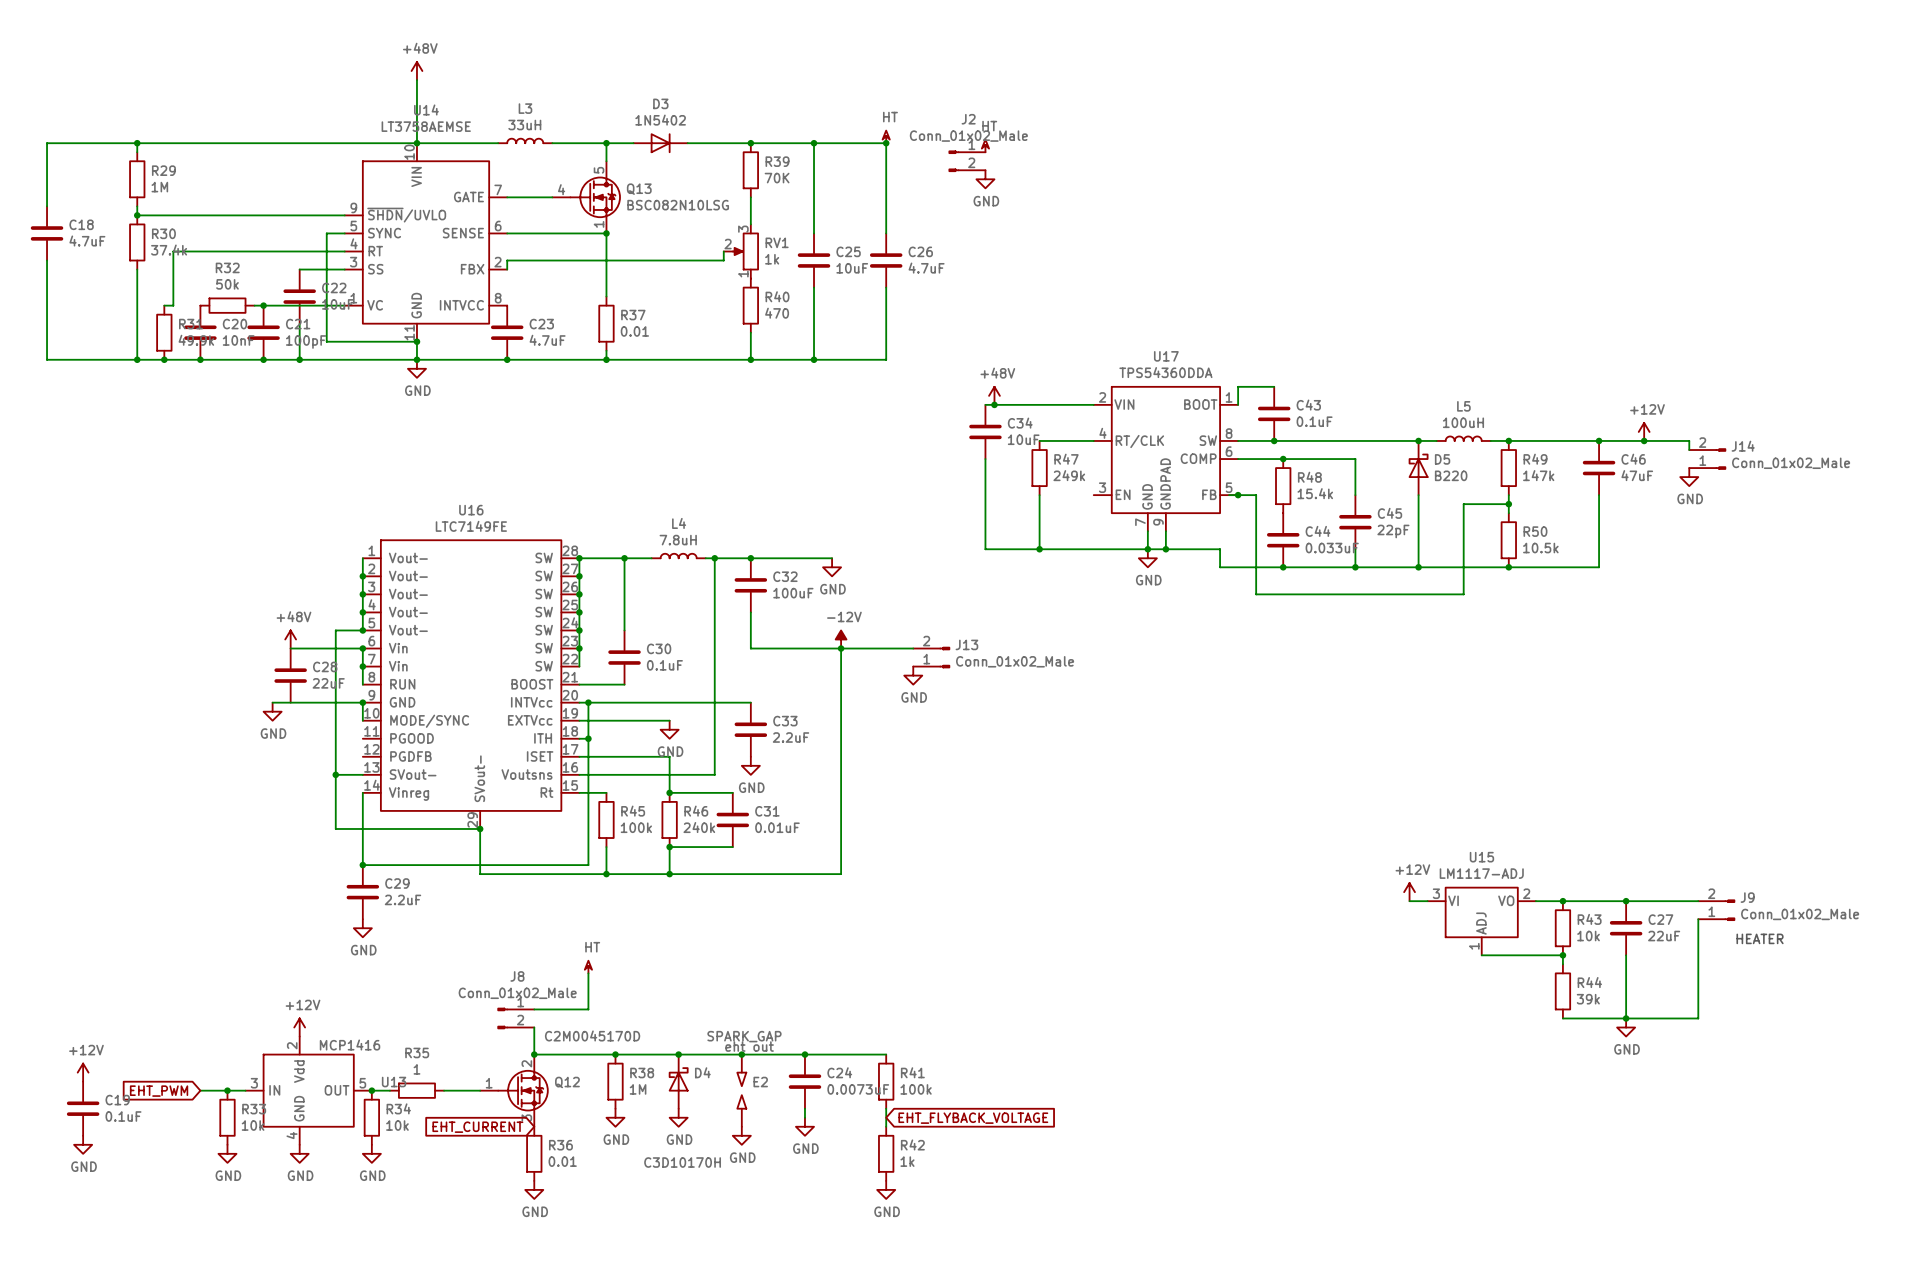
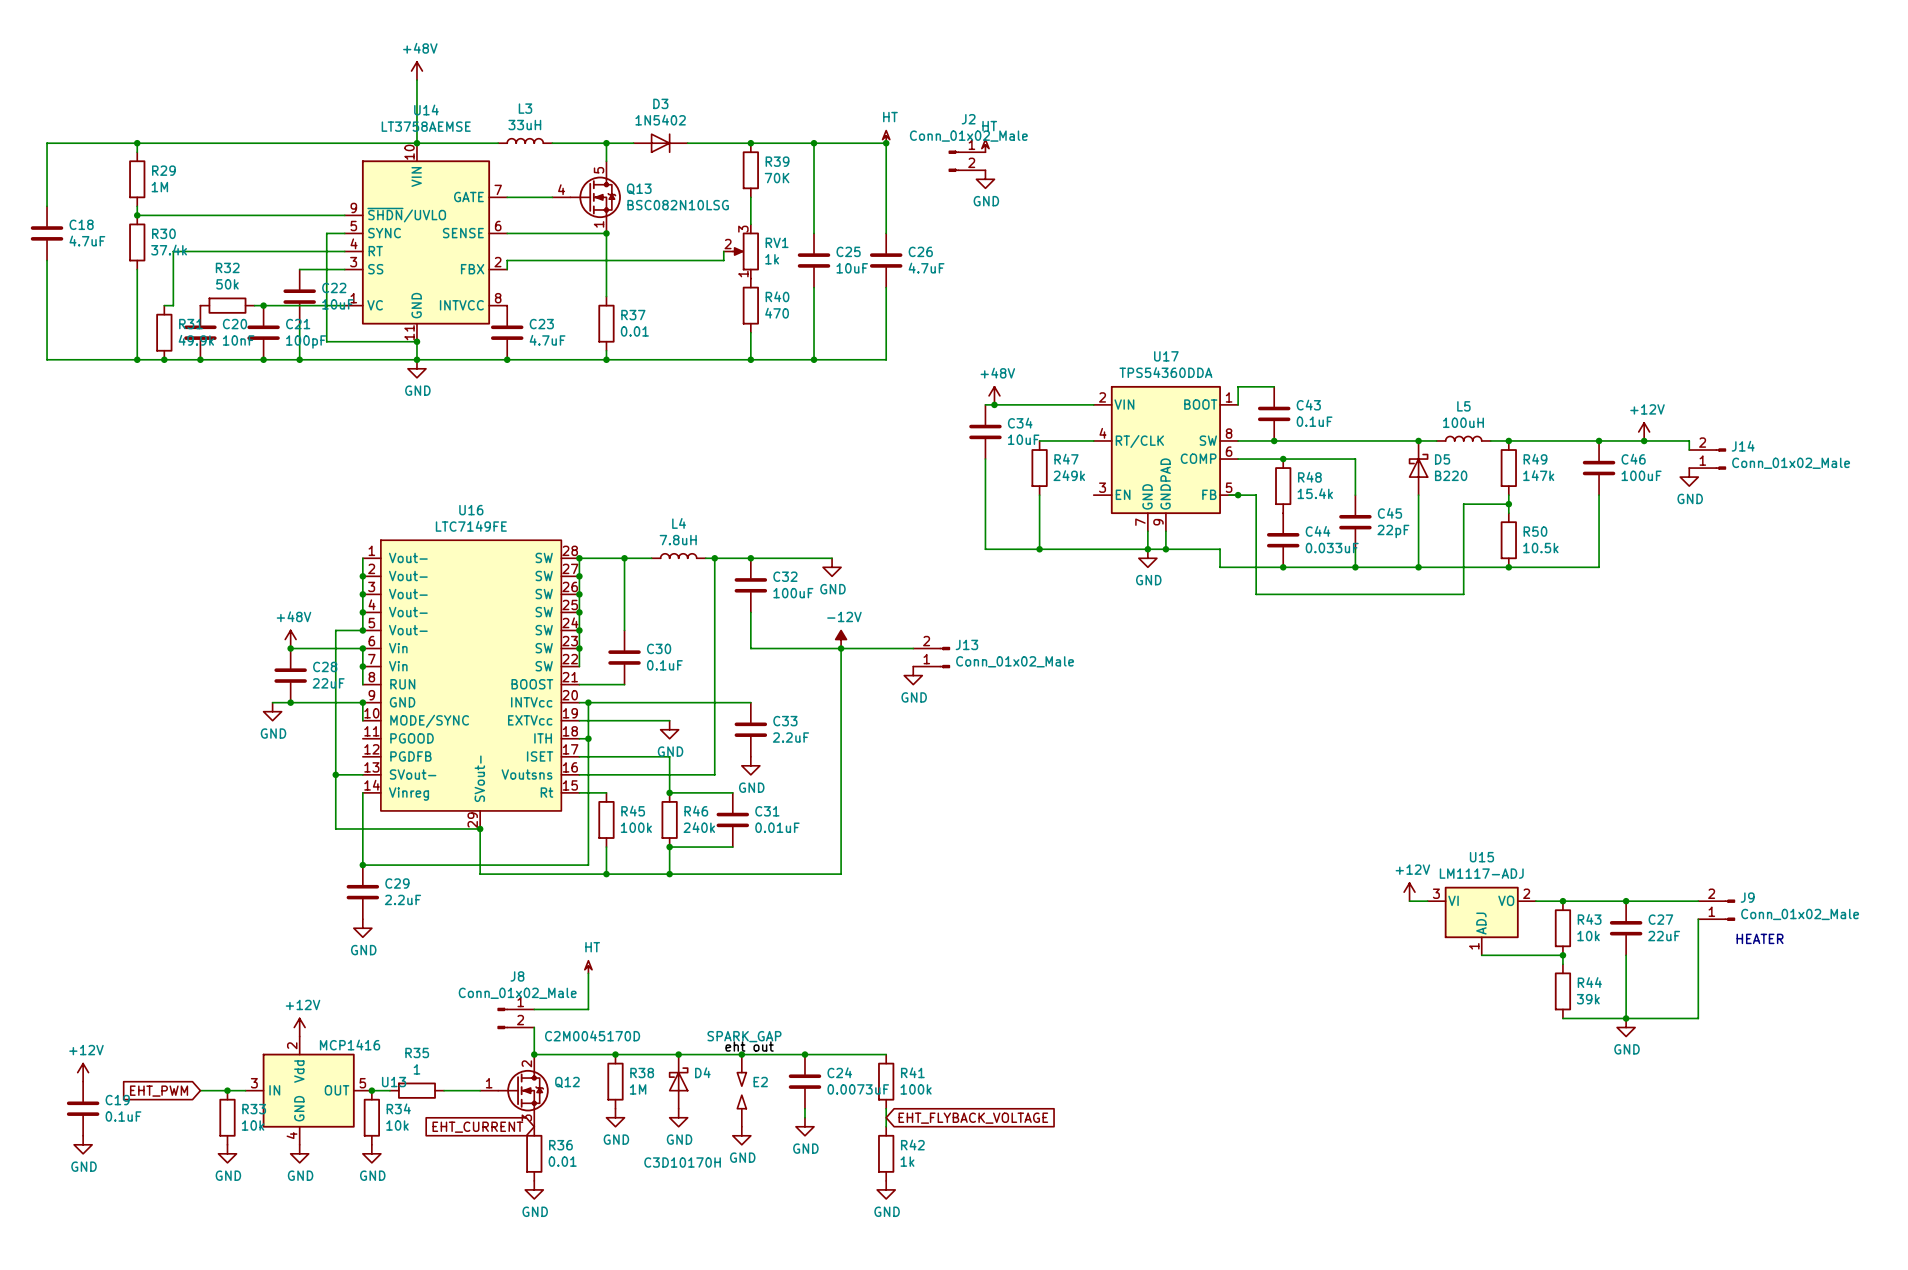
C46 value: 47uF (1637, 475) -> 100uF (1641, 475)
junction: none -> (290, 648)
junction: none -> (290, 702)

